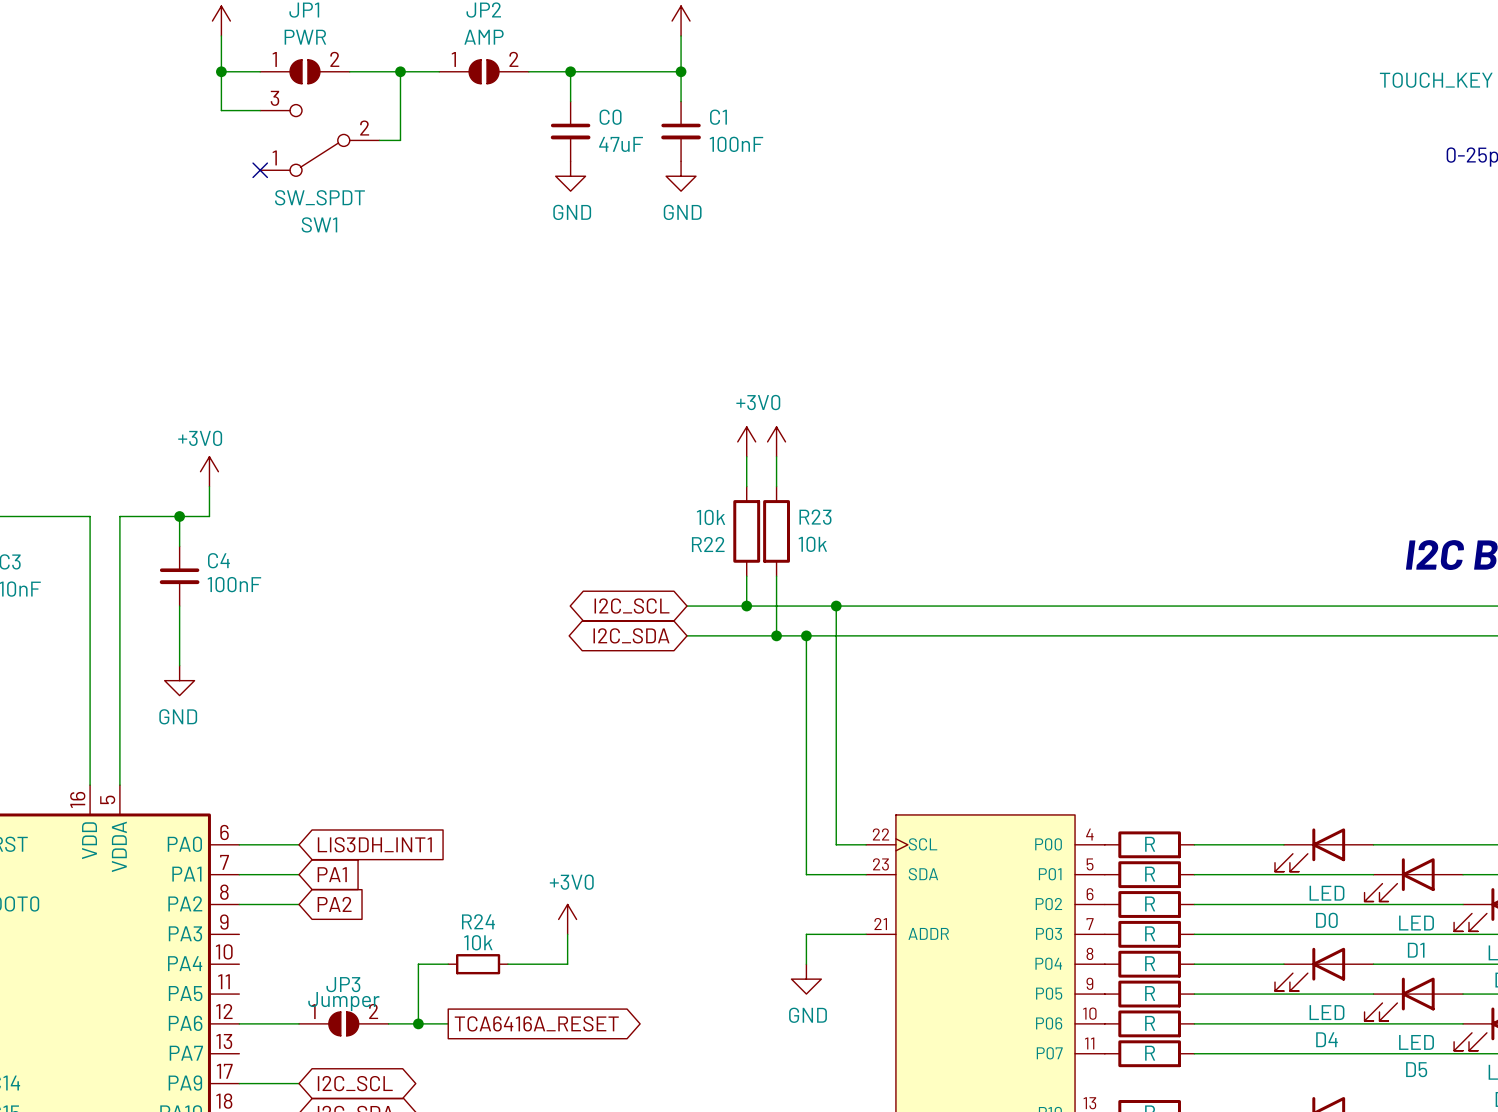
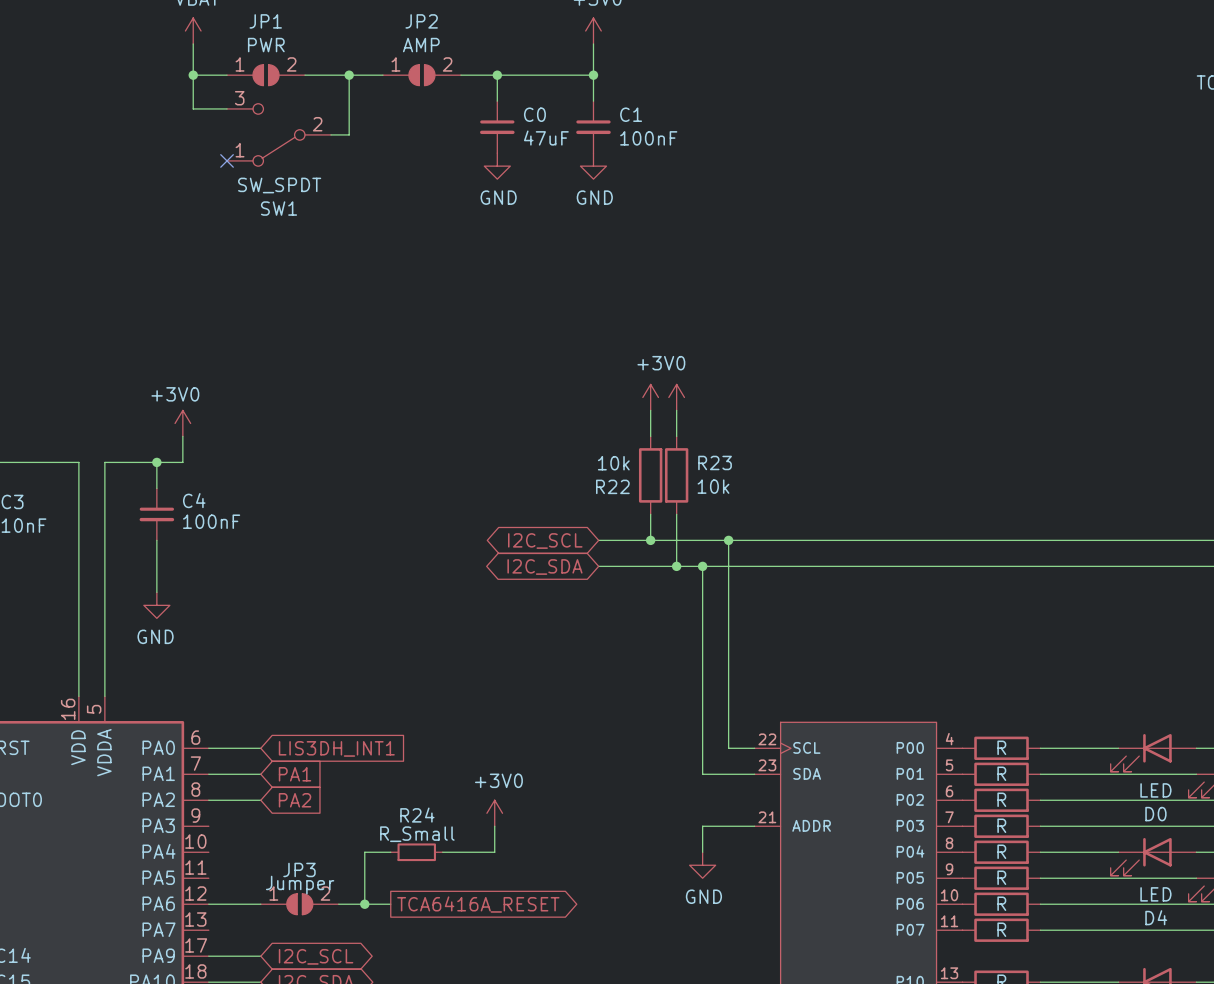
R24 value: 10k (478, 942) -> R_Small (417, 834)

